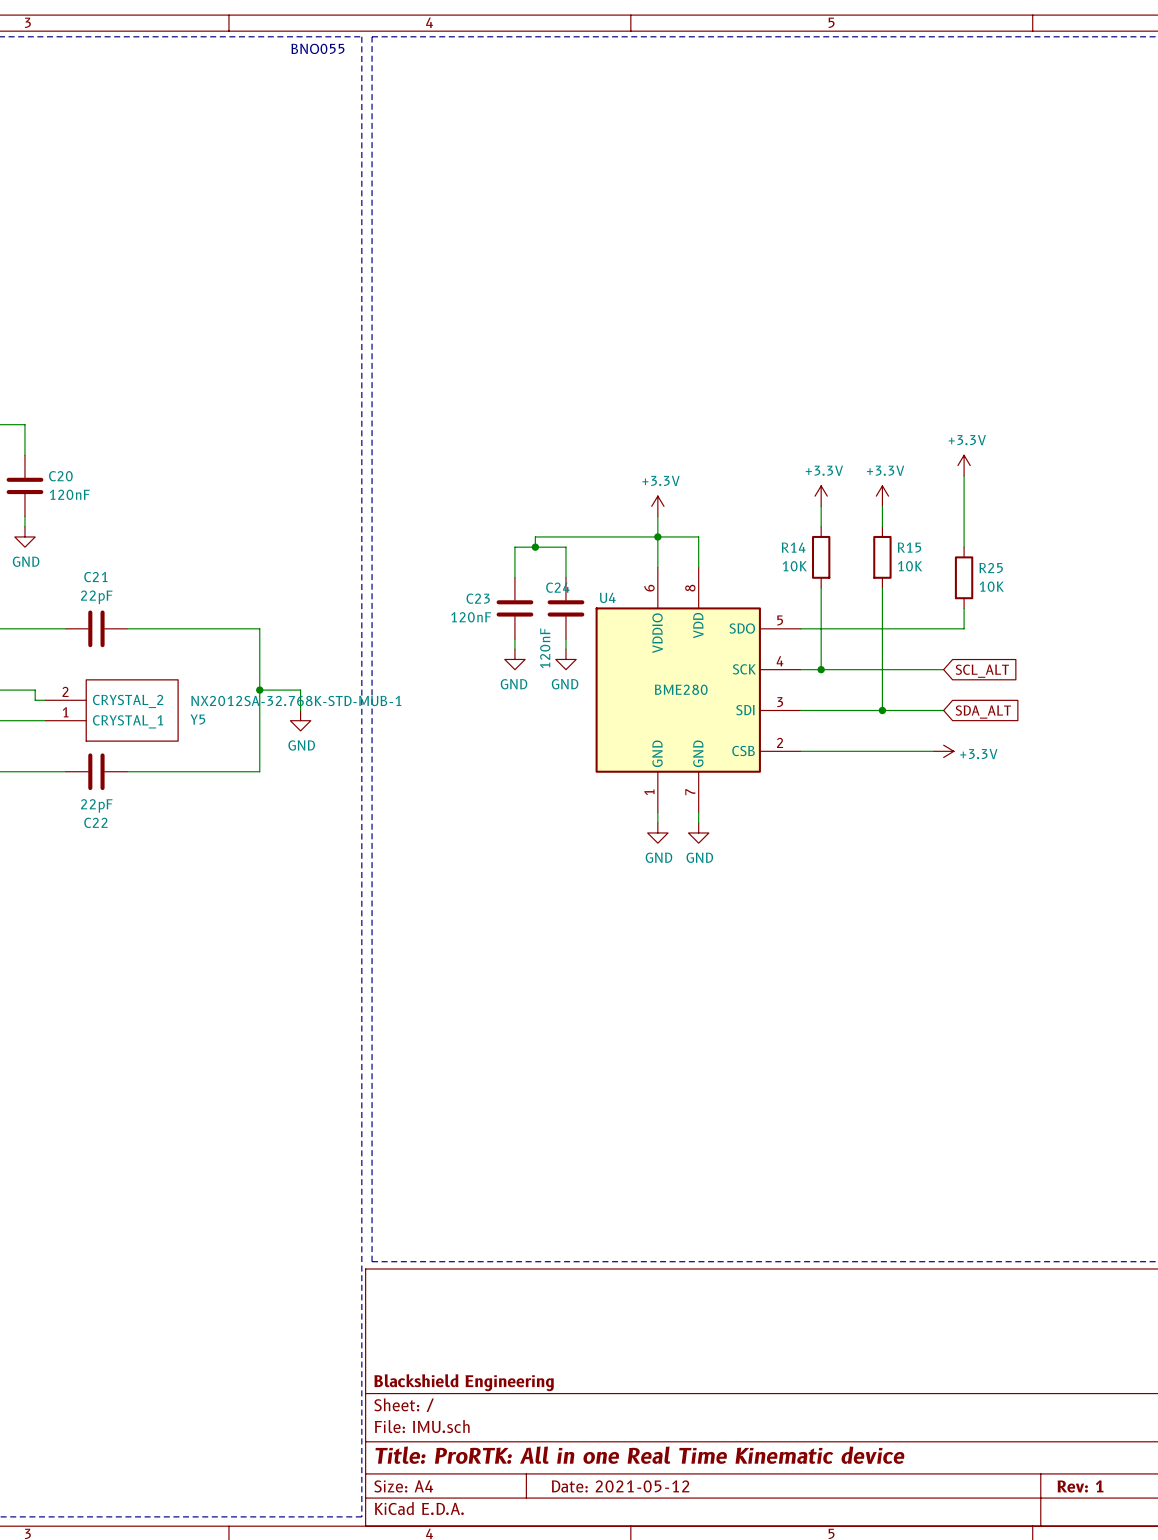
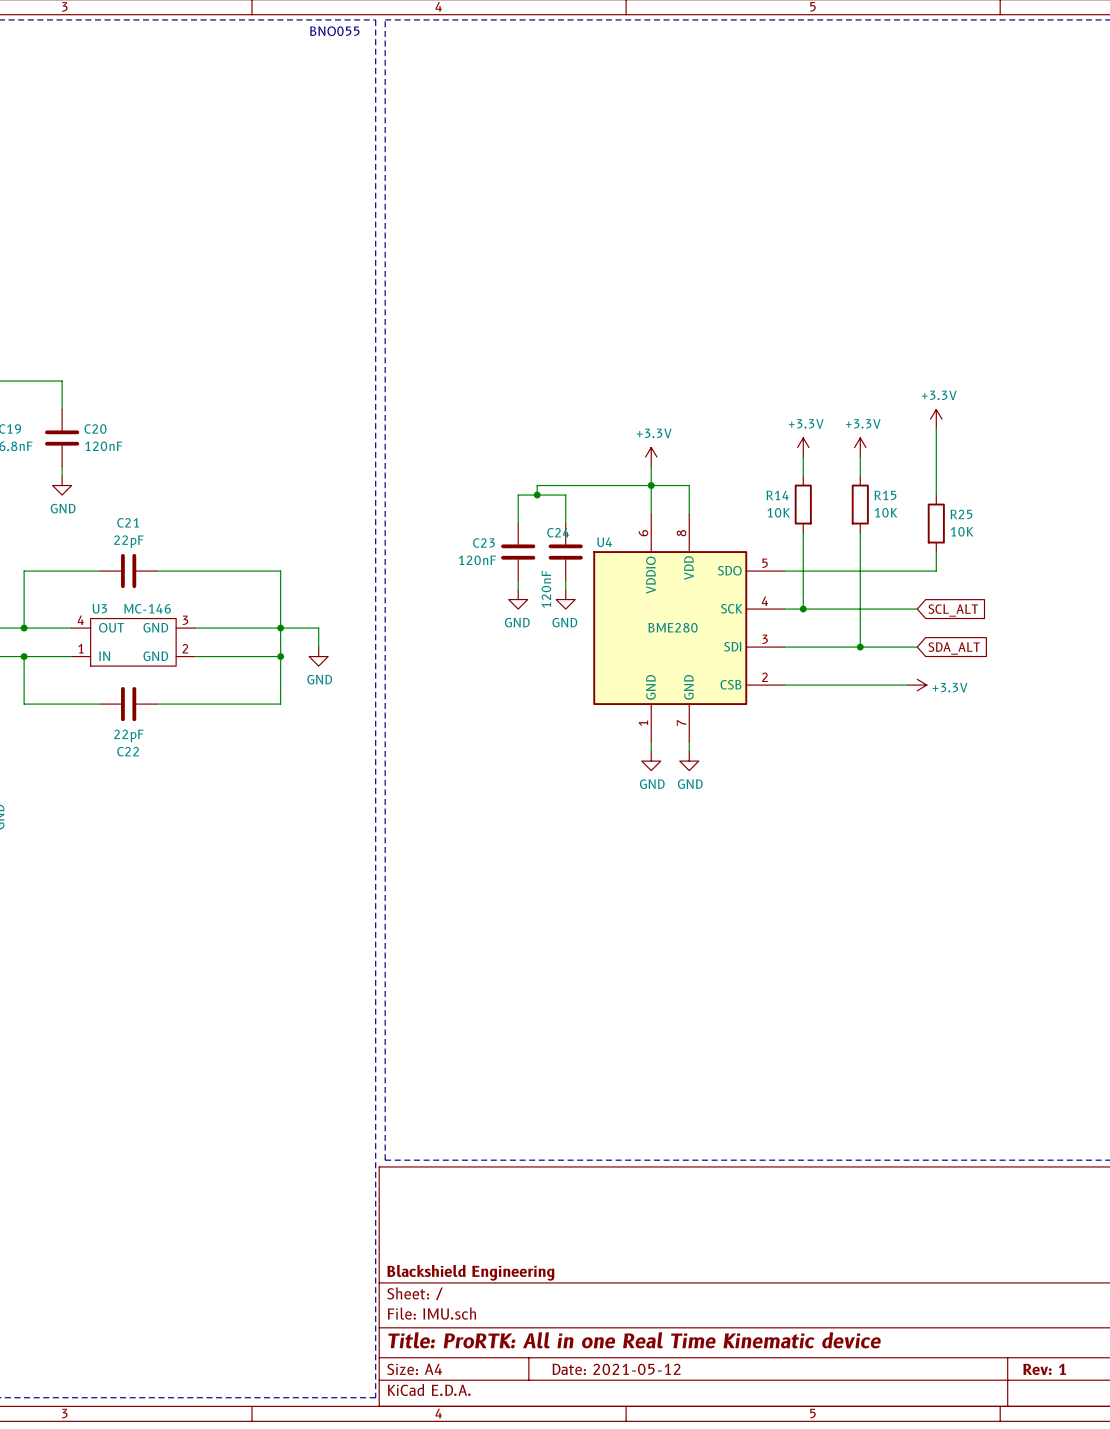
wire: (35, 690) (35, 700) (45, 700) -> none
wire: none -> (195, 628) (280, 628)
U3: none -> MC-146 (133, 642)
Y5: NX2012SA-32.768K-STD-MUB-1 (112, 710) -> none
wire: none -> (195, 656) (280, 656)
junction: none -> (280, 656)

